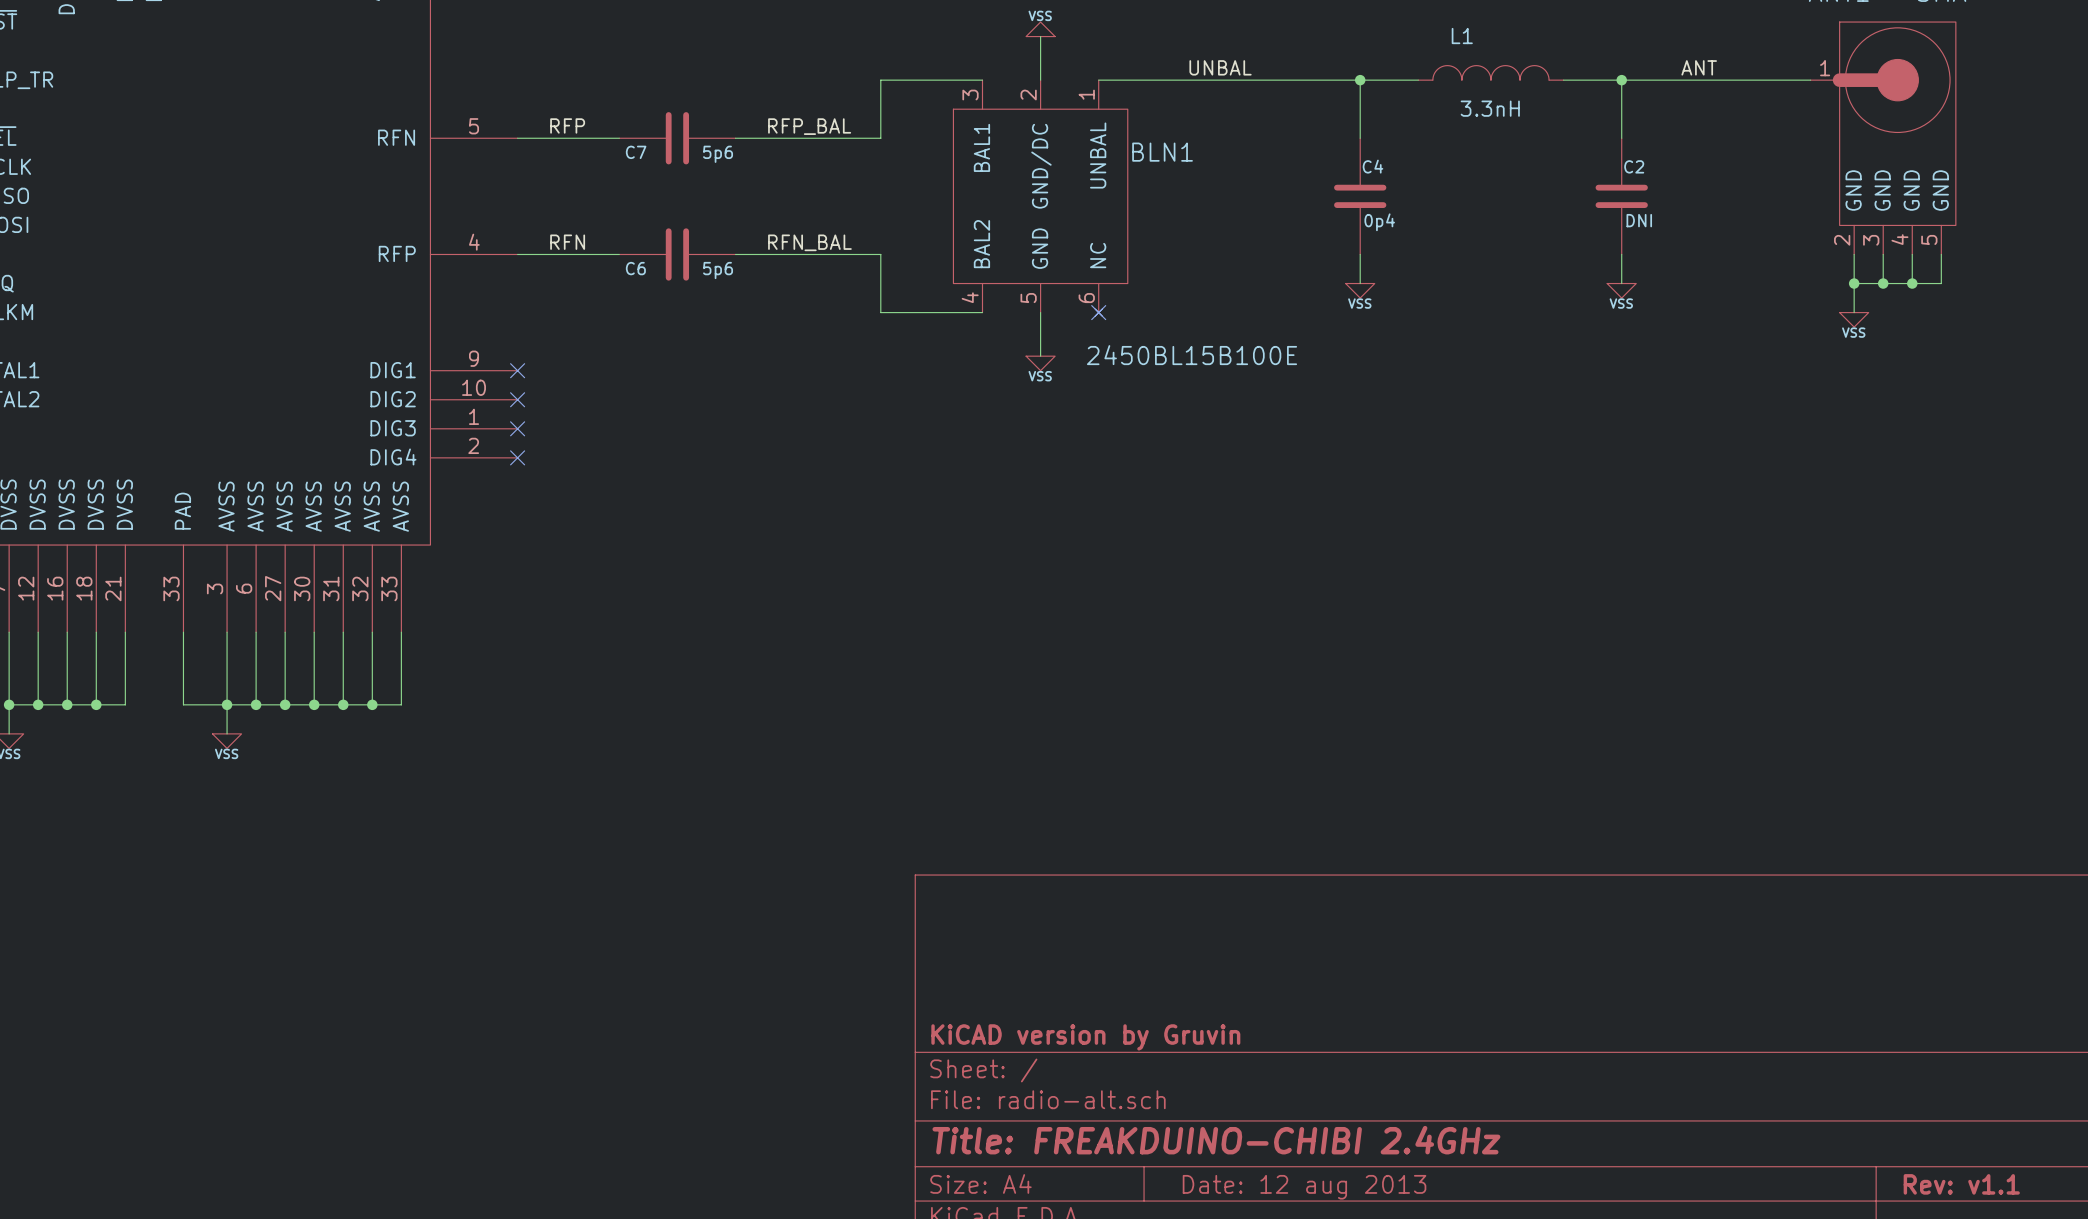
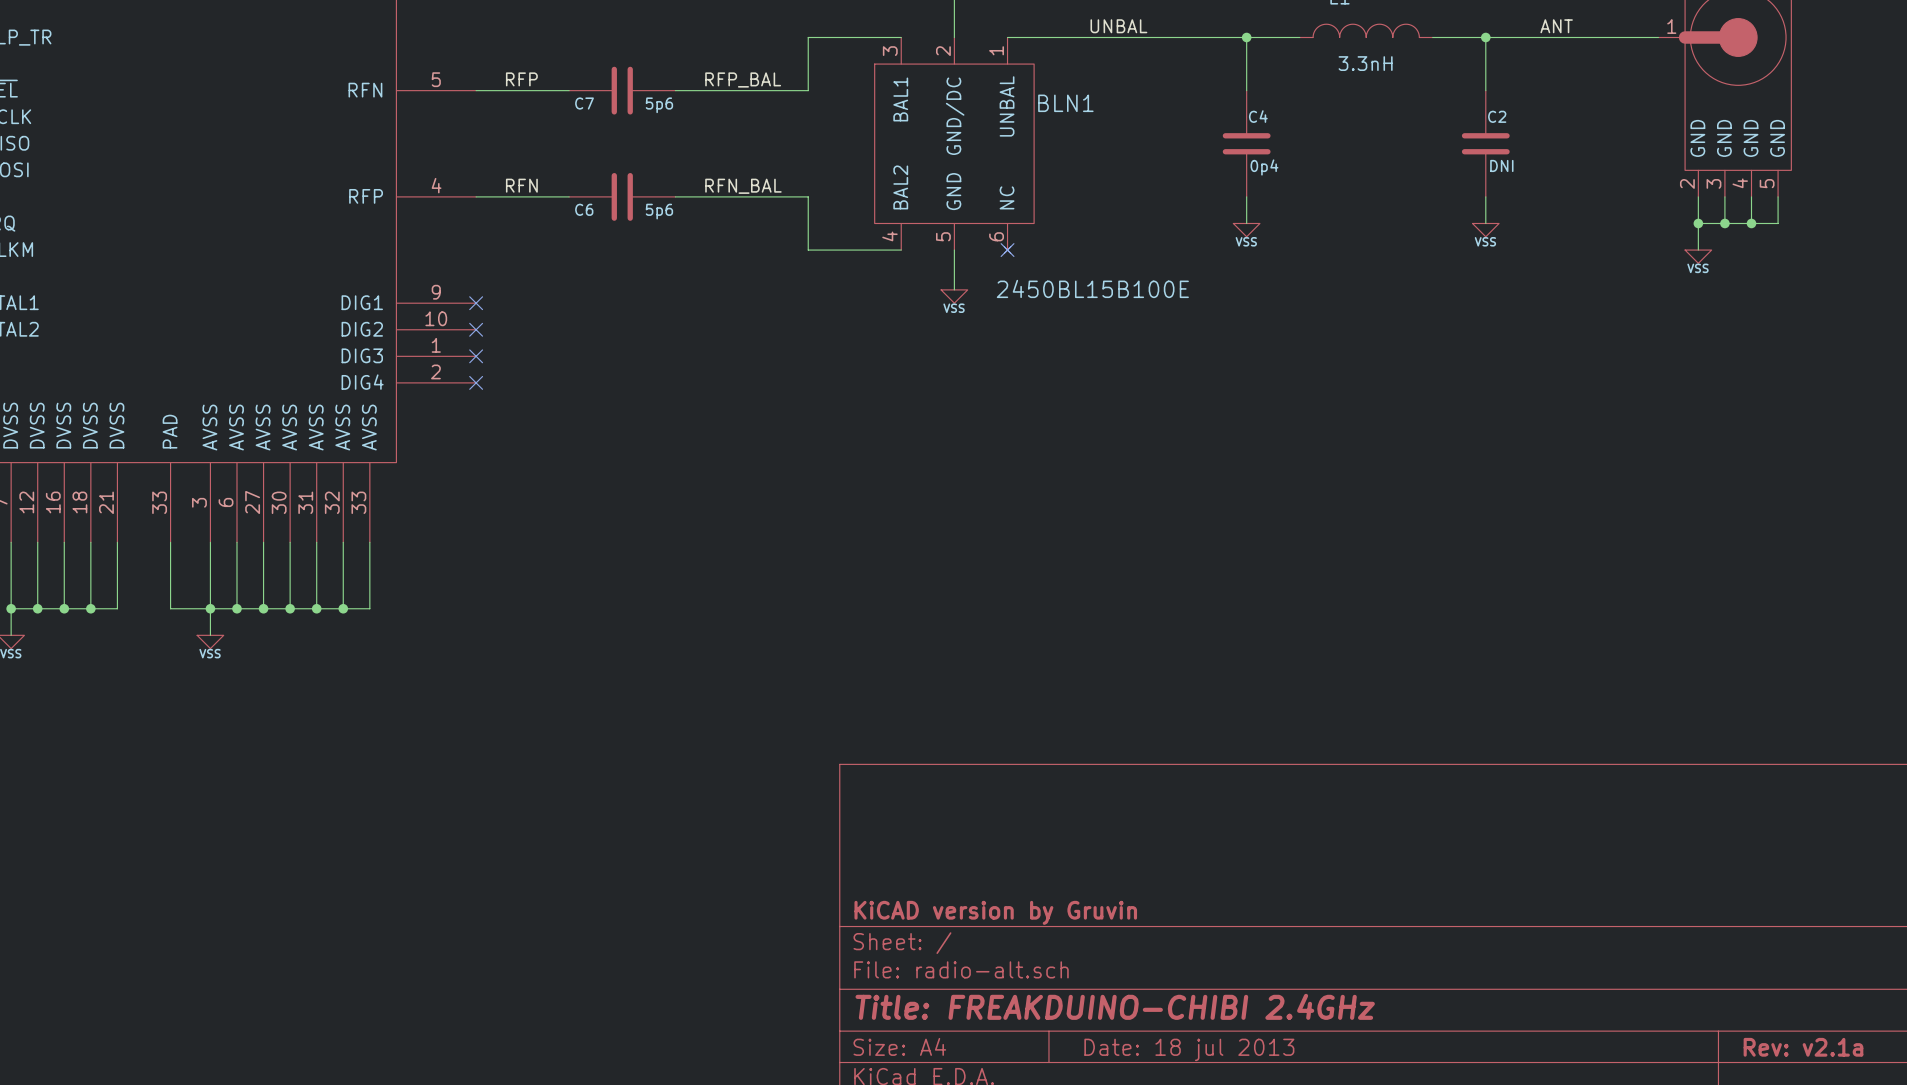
title block: Rev: v1.1 (1961, 1184) -> Rev: v2.1a (1803, 1047)
title block: Date: 12 aug 2013 (1304, 1187) -> Date: 18 jul 2013 (1189, 1049)

